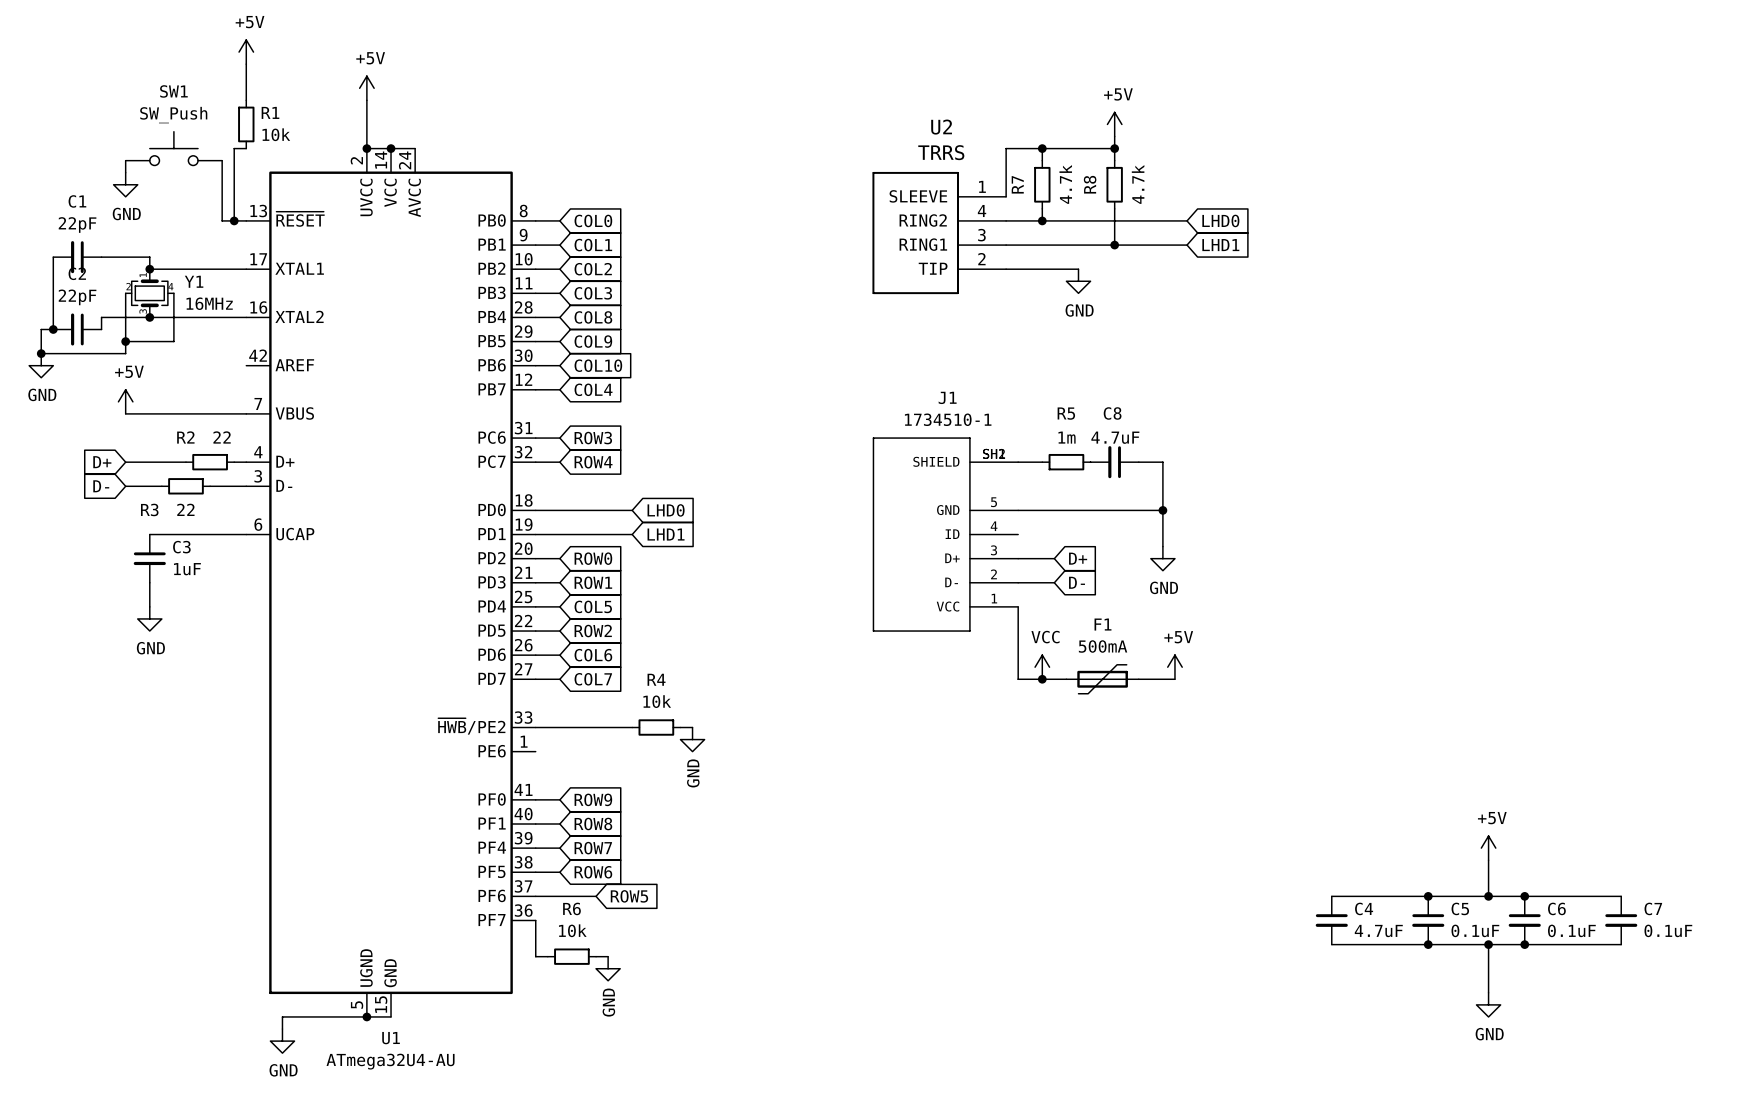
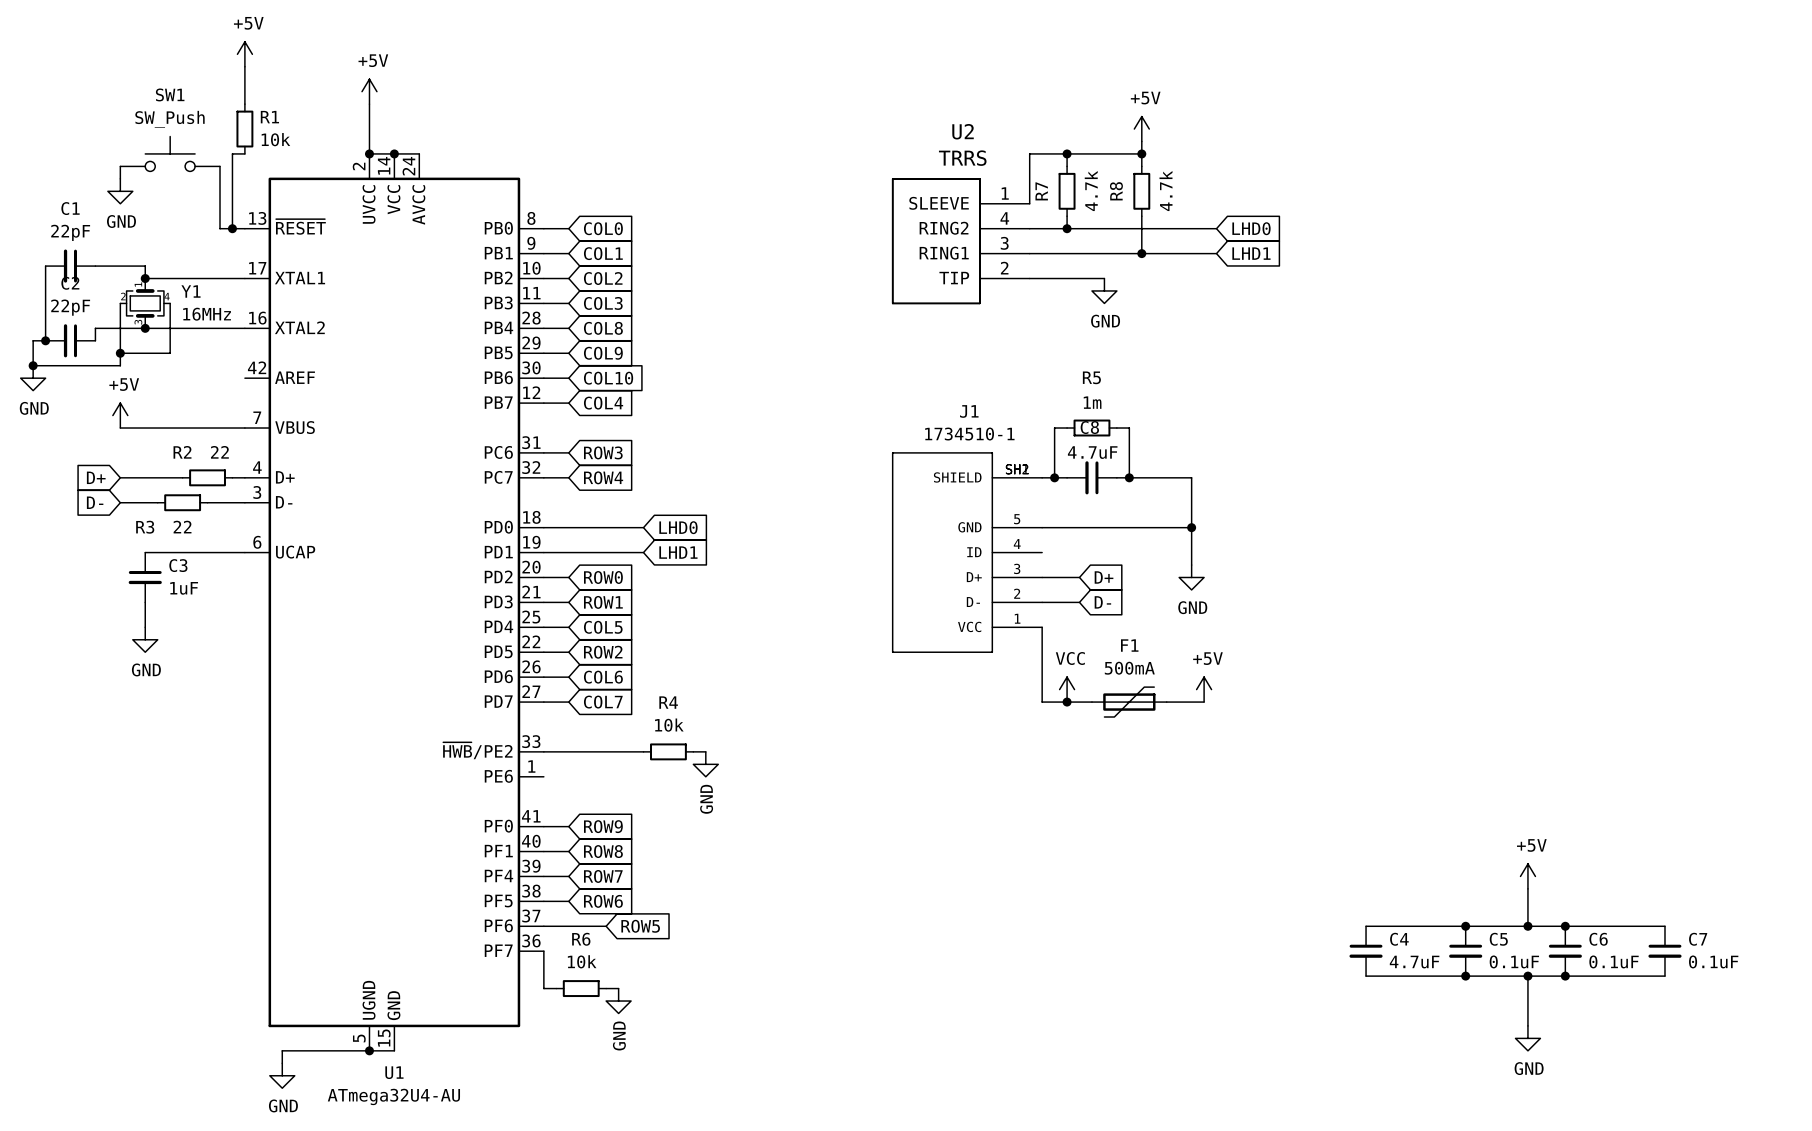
wire: none -> (1067, 428) (1054, 428) (1054, 477)
wire: none -> (1116, 428) (1129, 428) (1129, 477)
junction: none -> (1054, 477)
R5 position: (1066, 462) -> (1091, 428)
junction: none -> (1129, 477)
C8 position: (1114, 462) -> (1091, 477)

